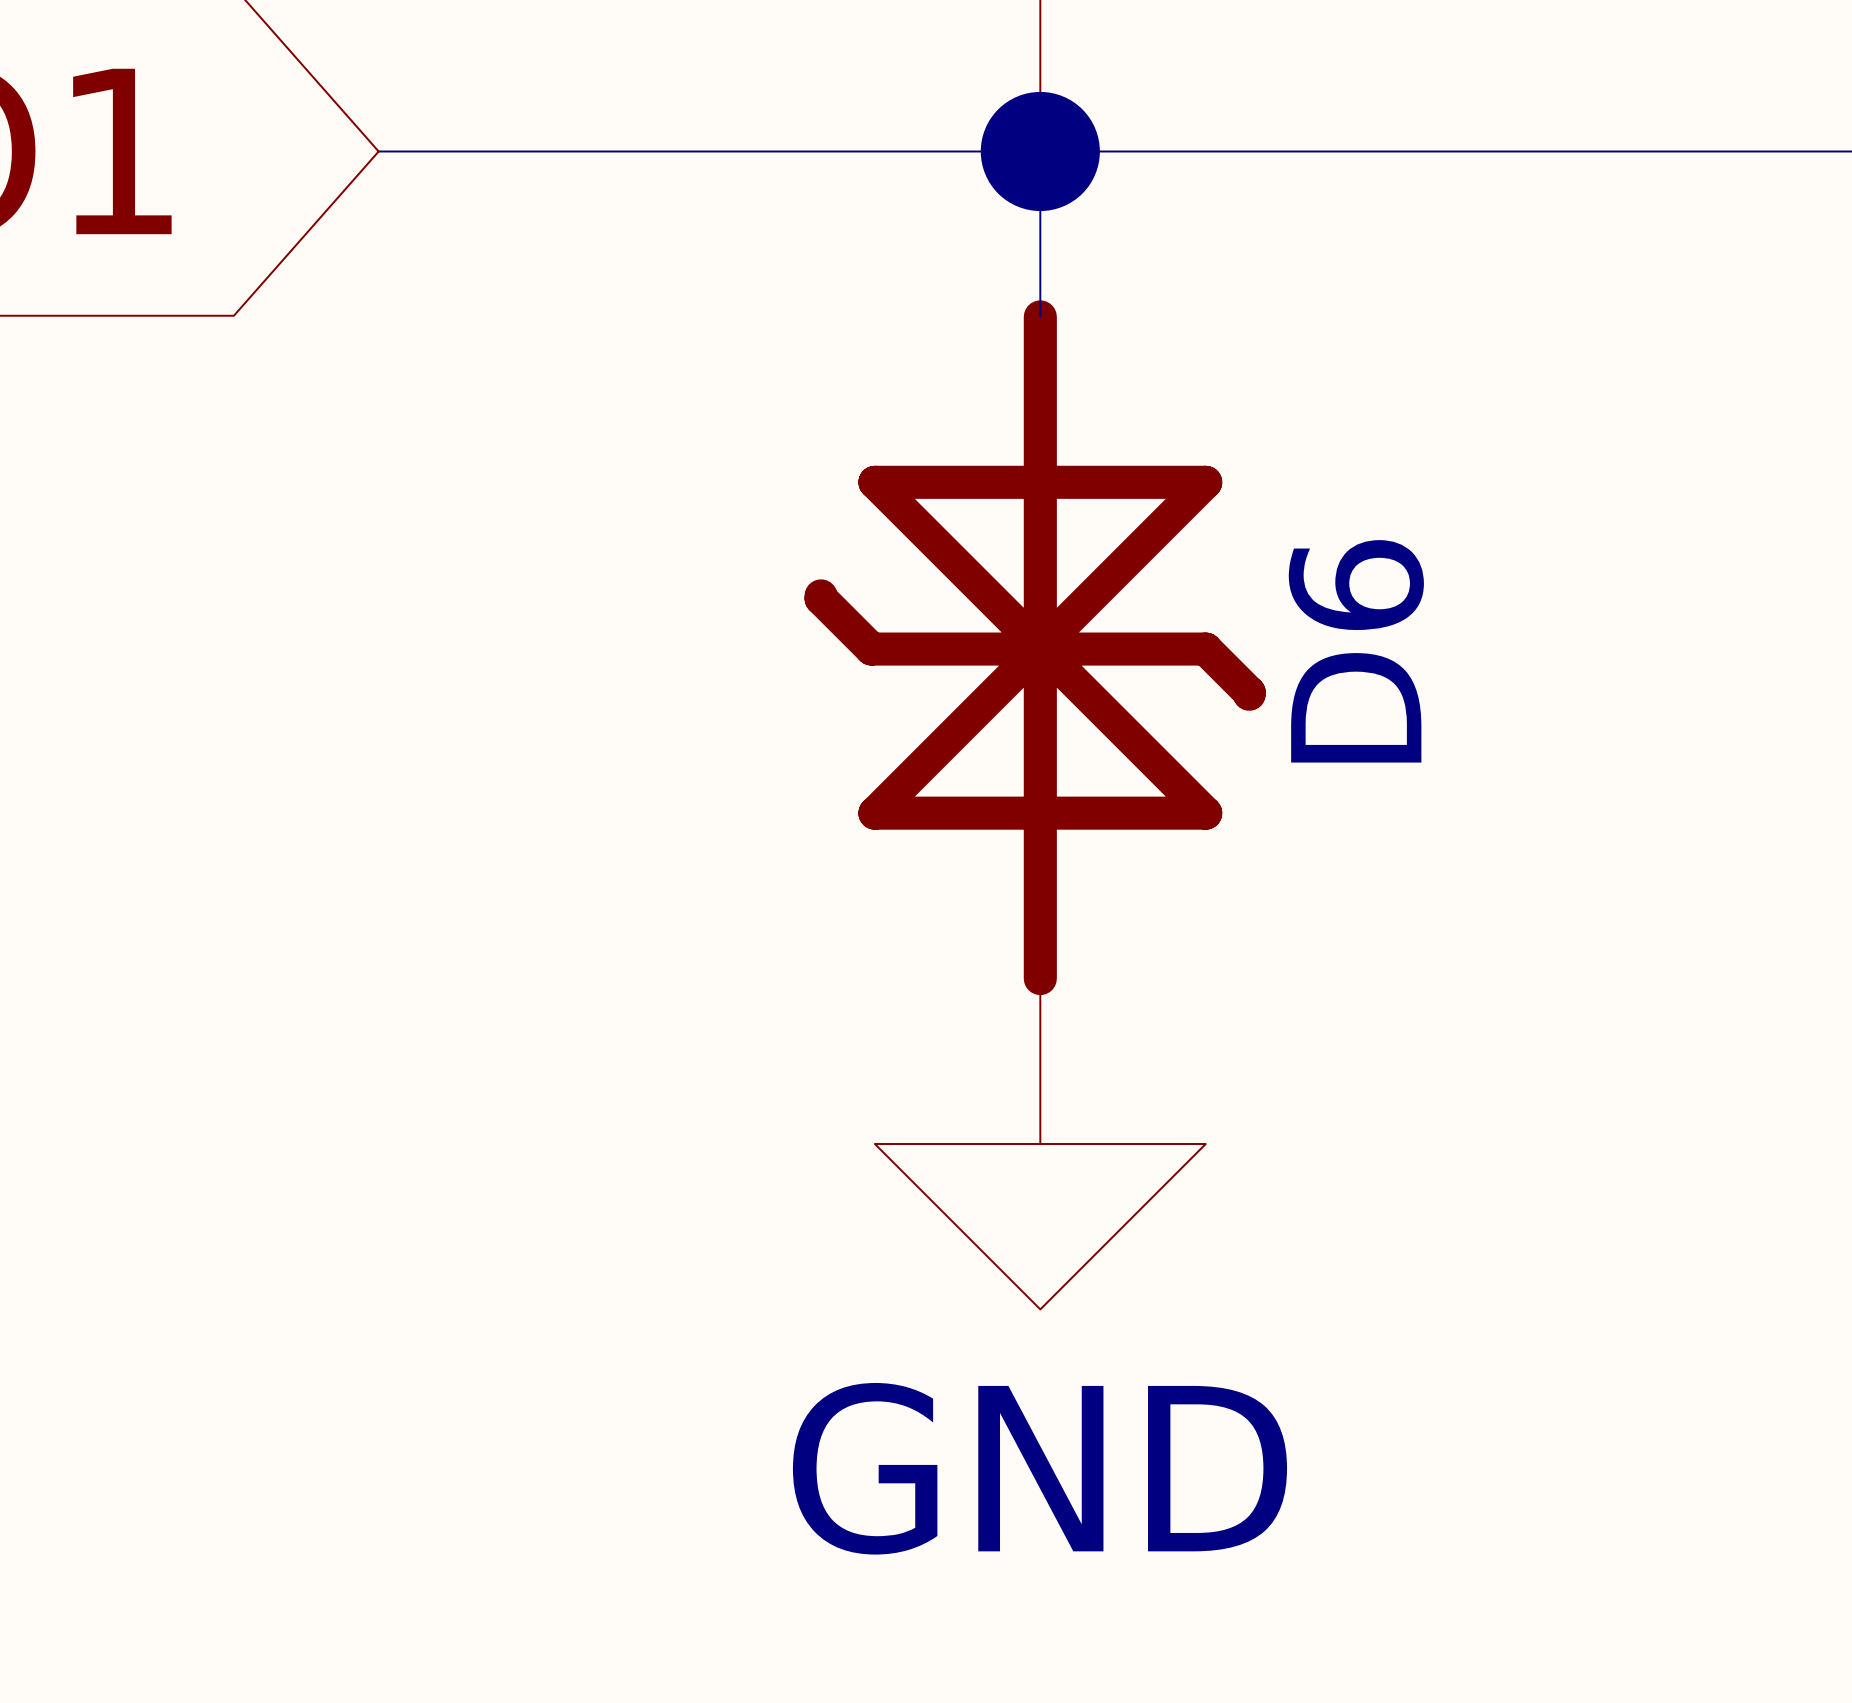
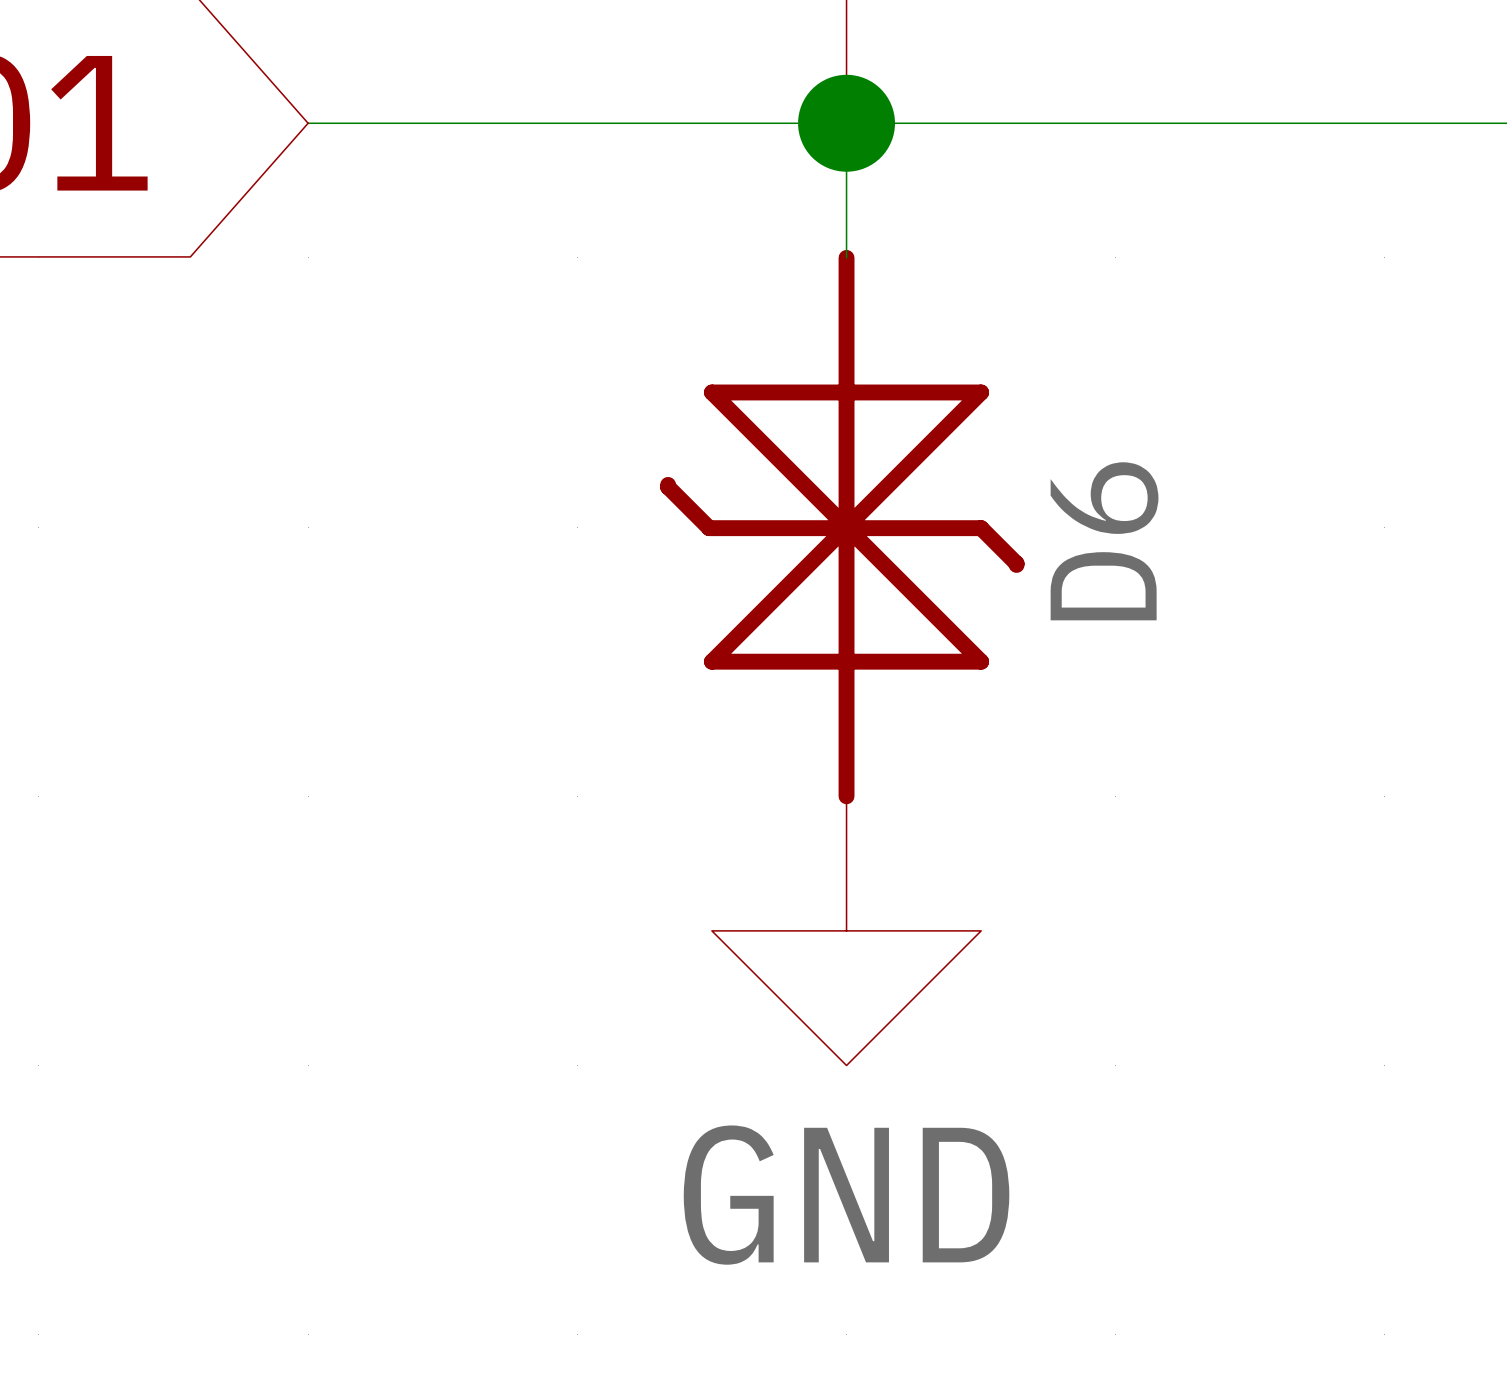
D6 symbol: [804, 300, 1266, 996] -> [660, 249, 1025, 805]

